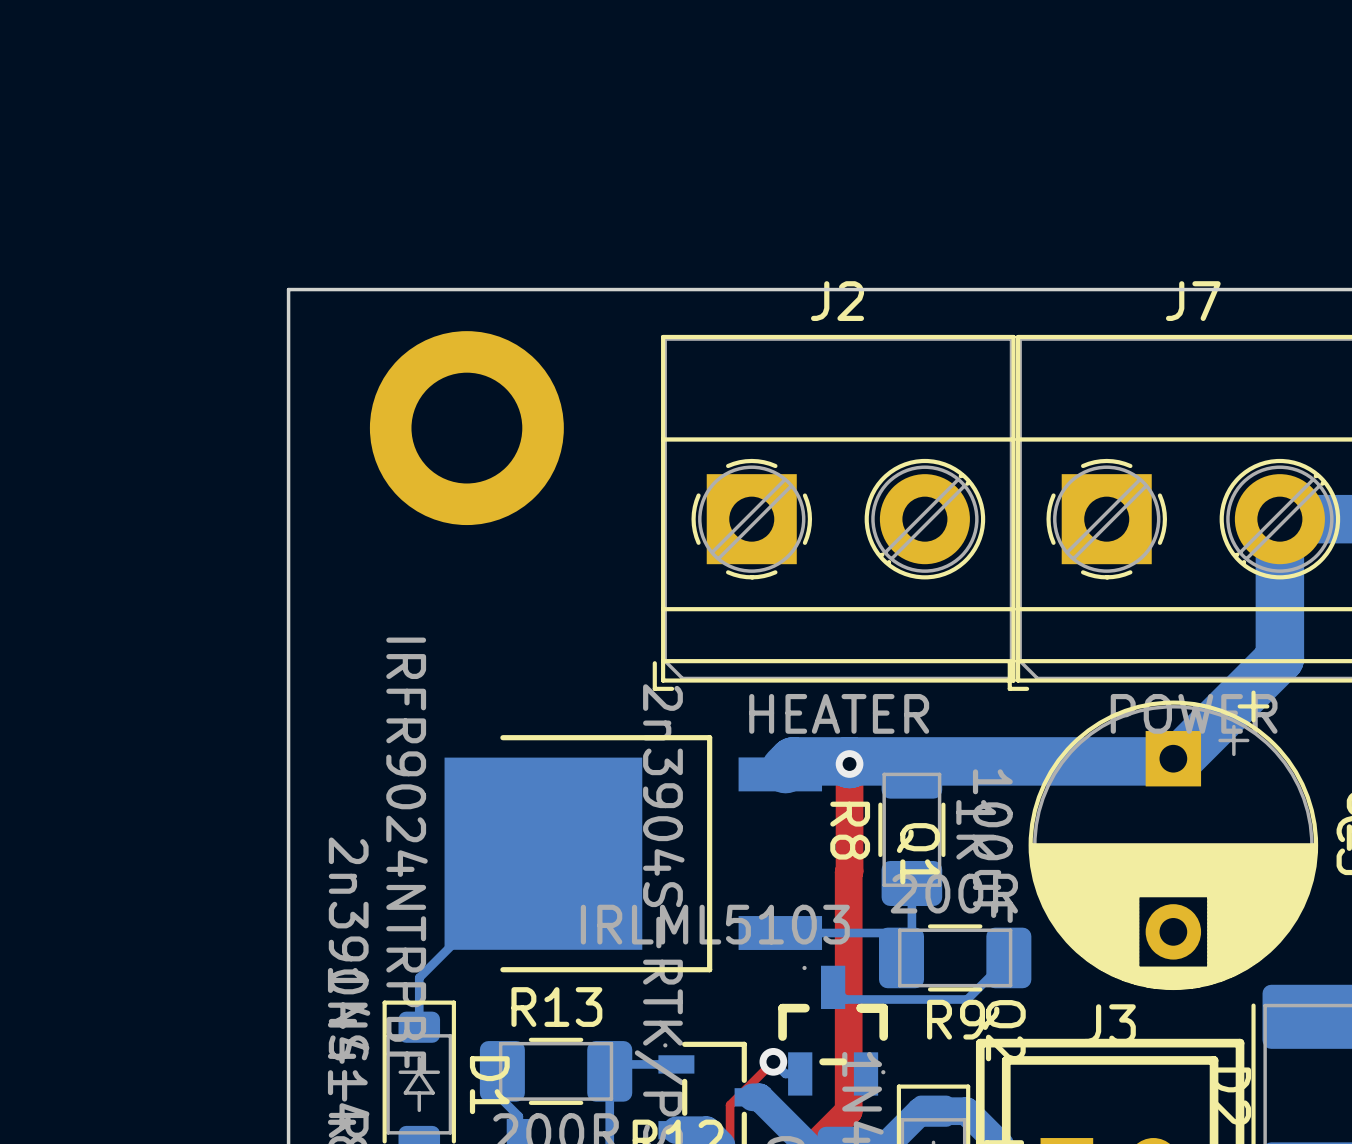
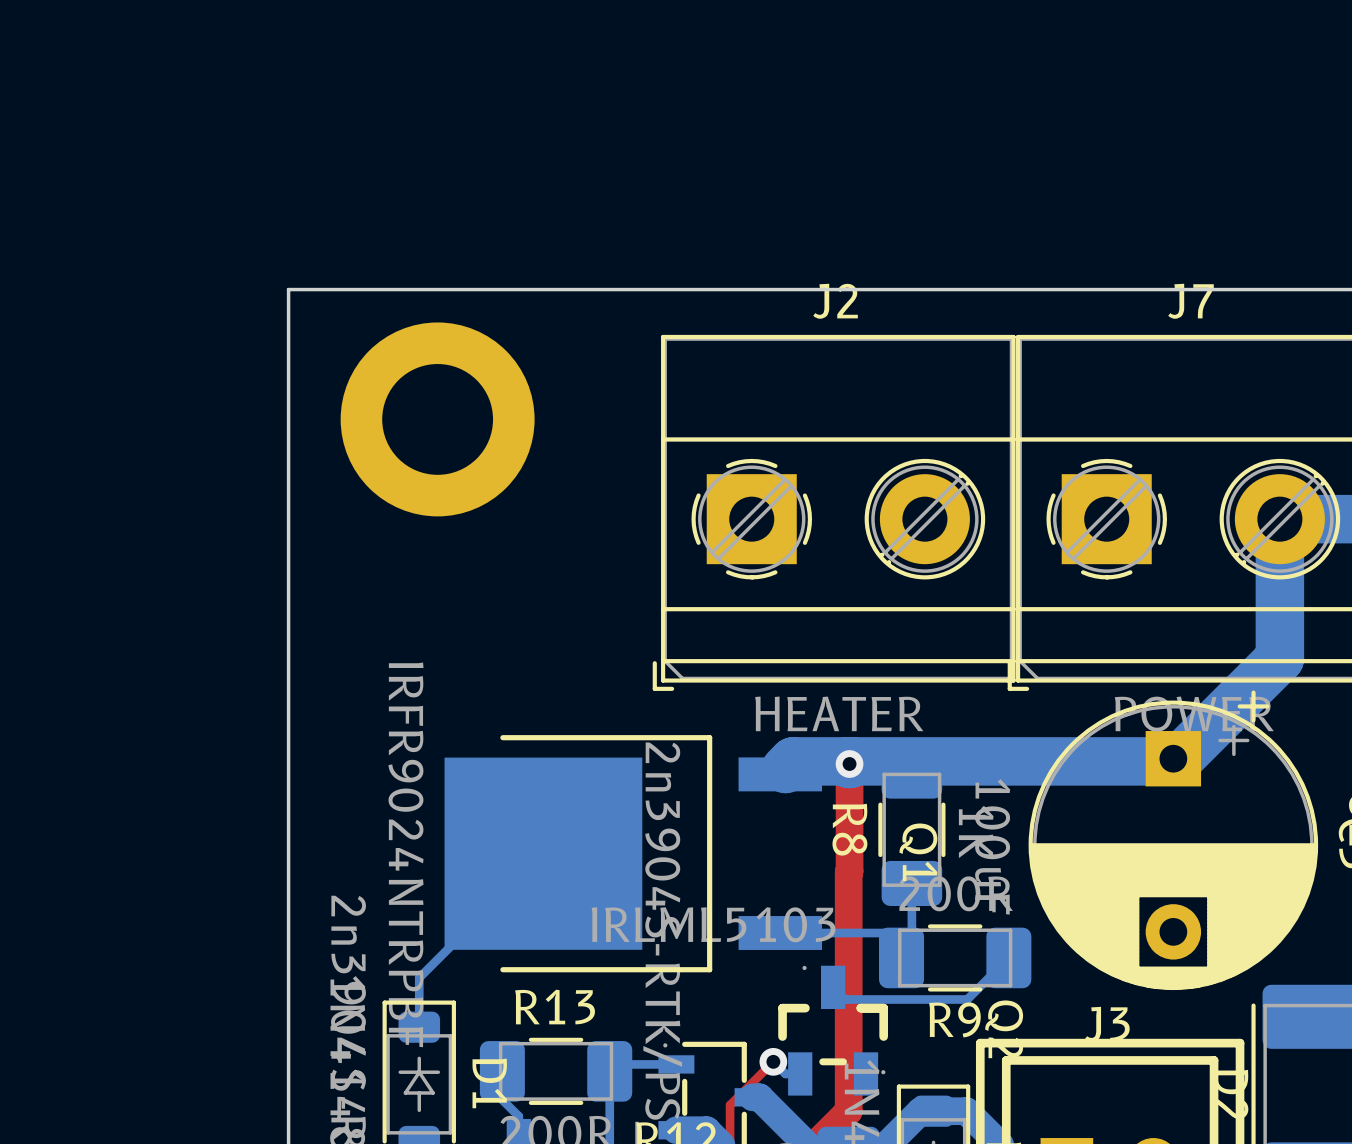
part position: (466, 428) -> (437, 419)

